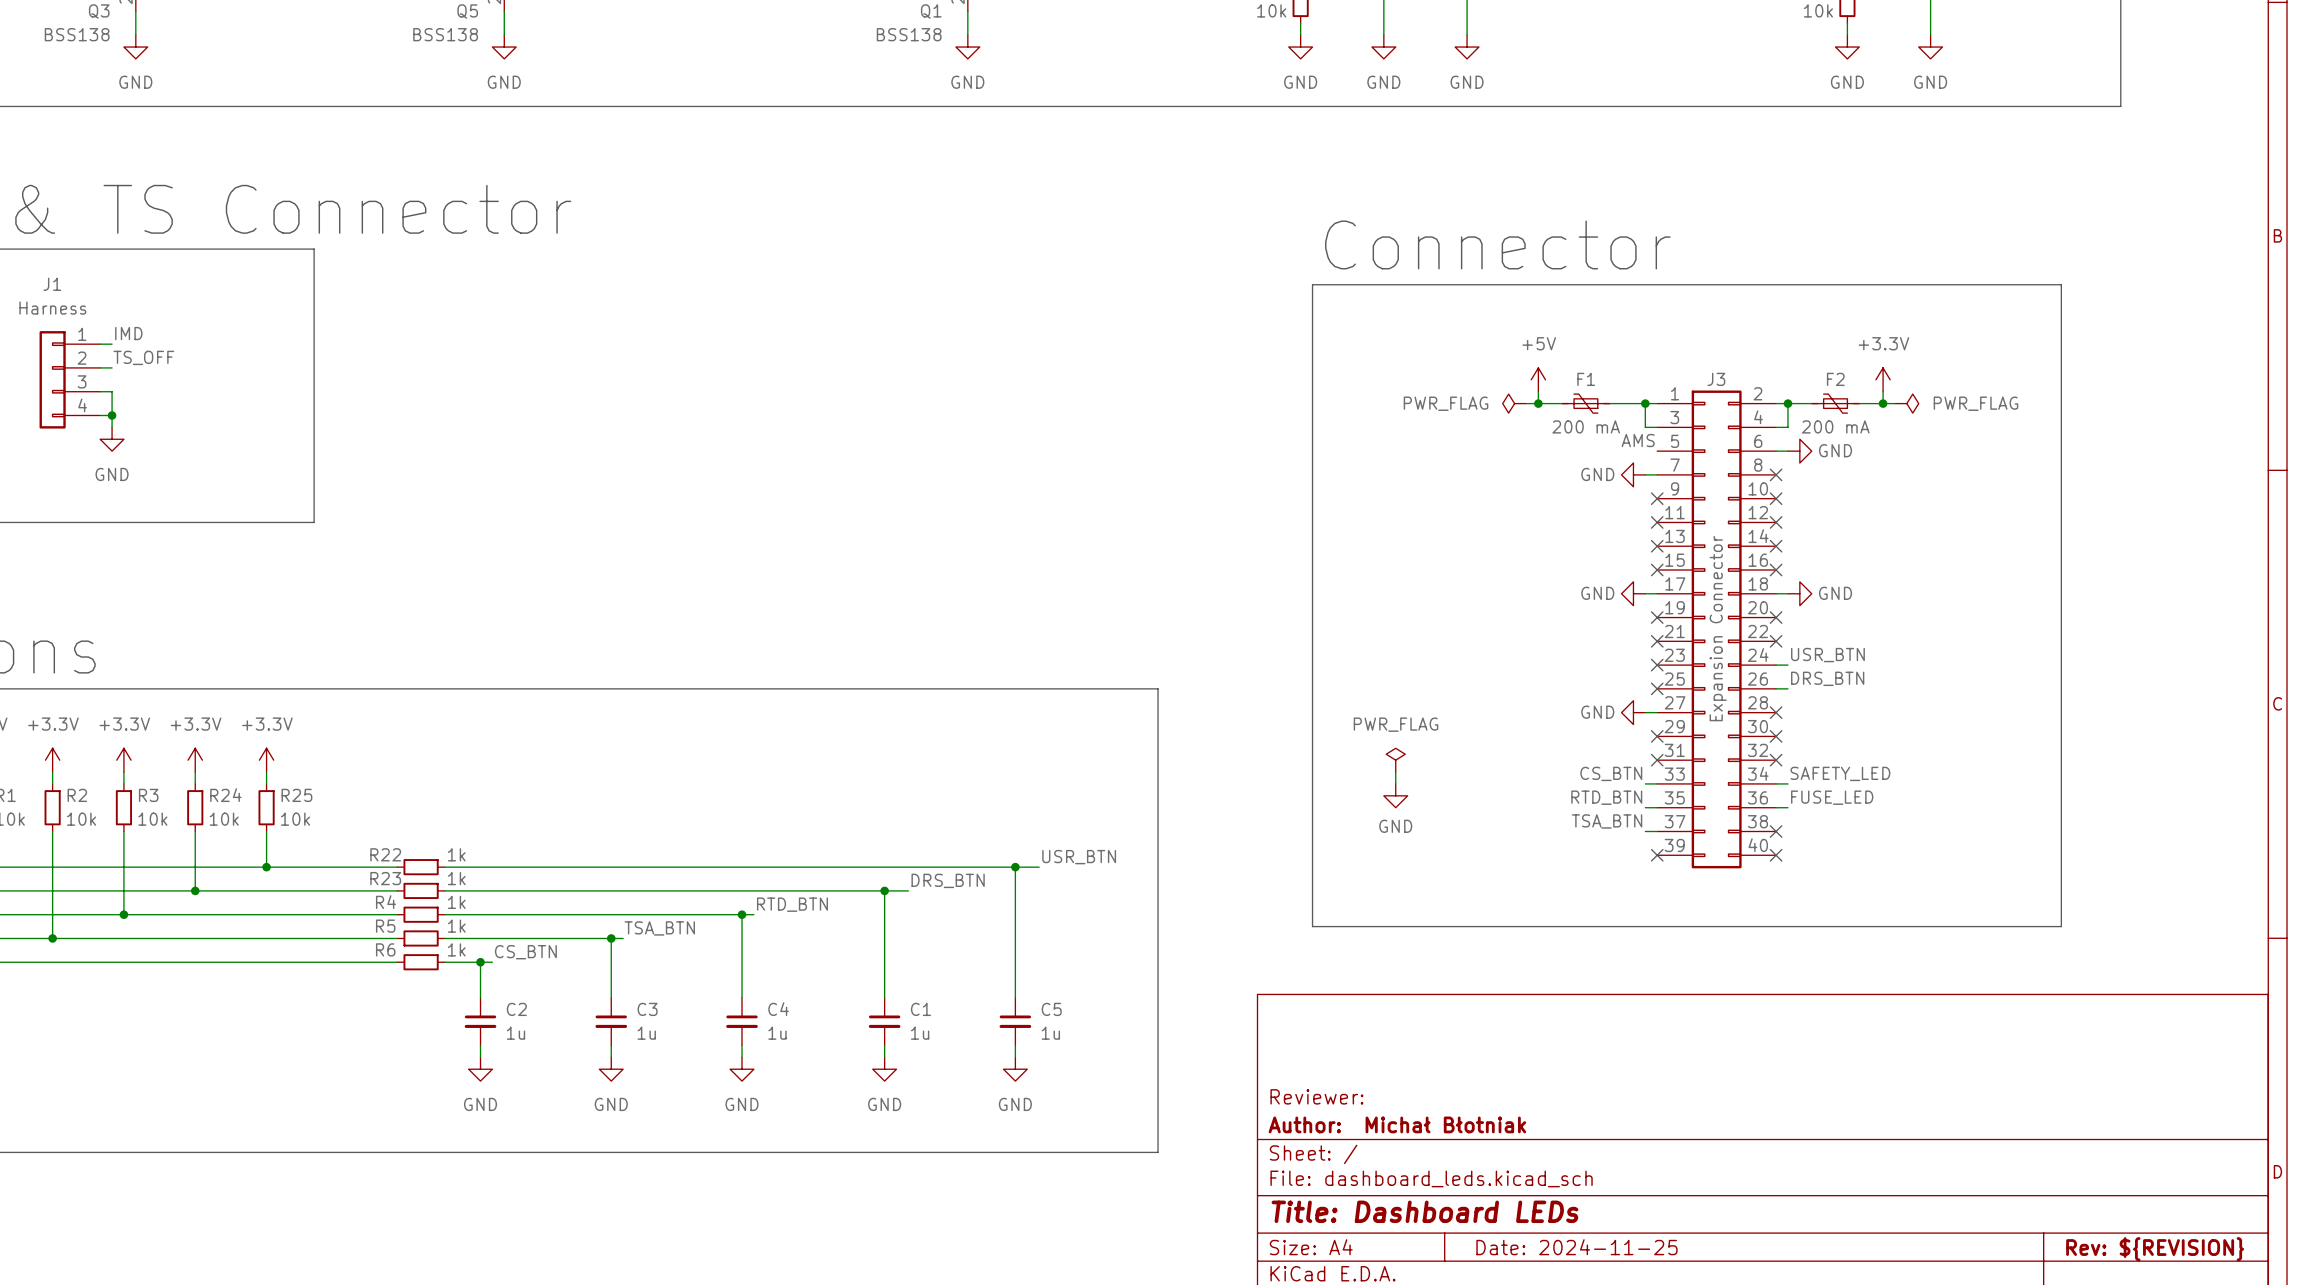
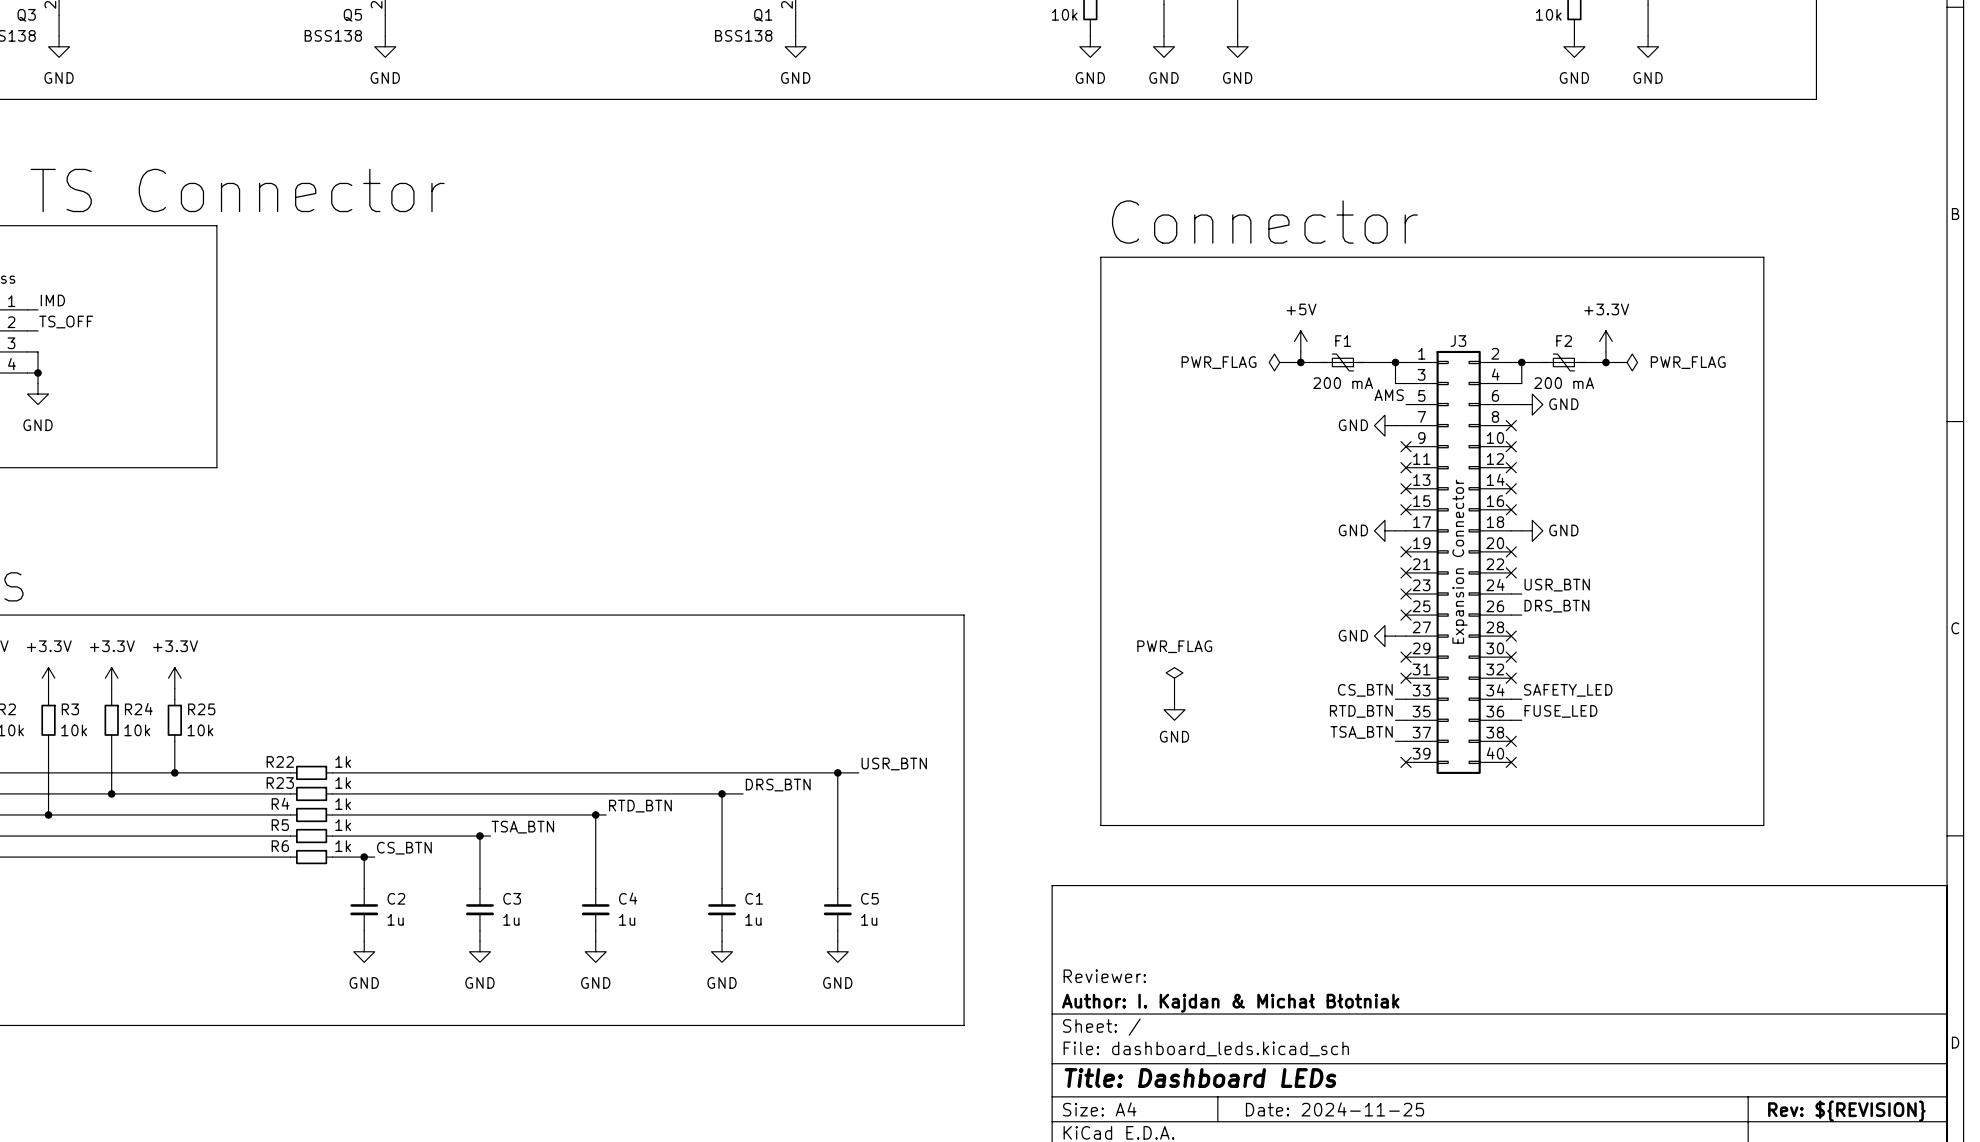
title block: Author: Michał Błotniak (1397, 1124) -> Author: I. Kajdan & Michał Błotniak (1230, 1003)

